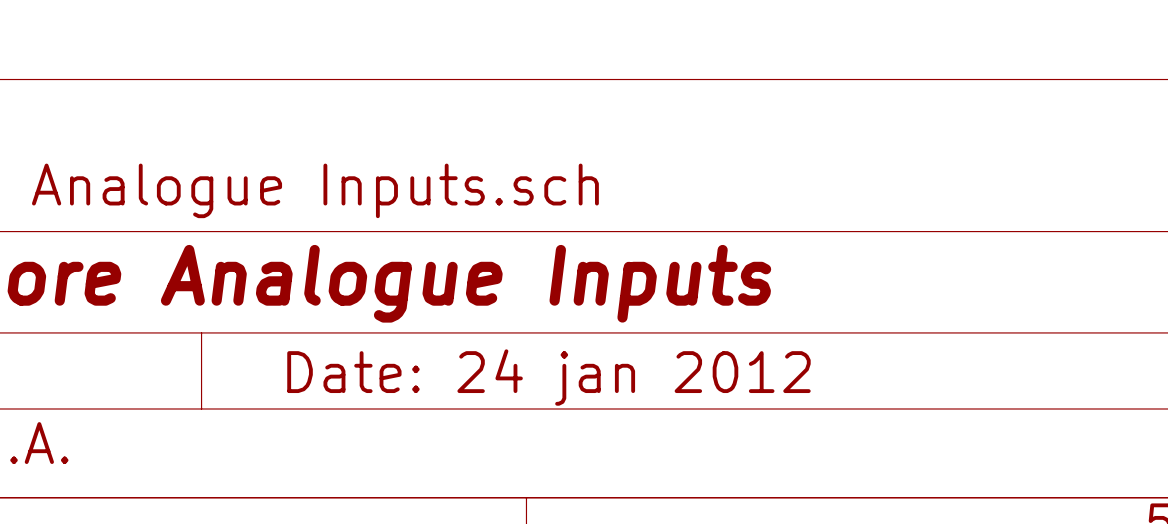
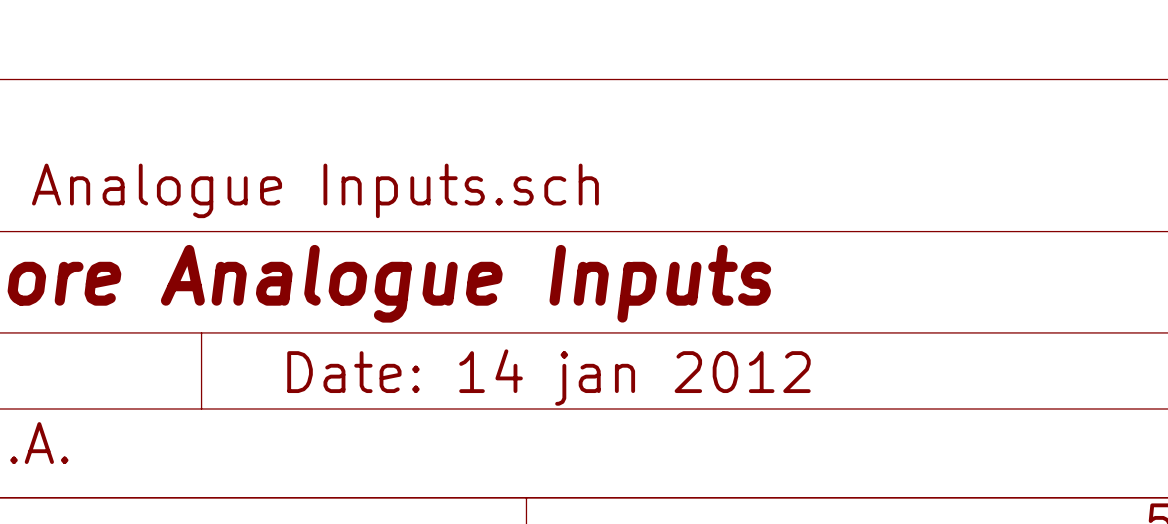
title block: Date: 24 jan 2012 (548, 377) -> Date: 14 jan 2012 (548, 377)

